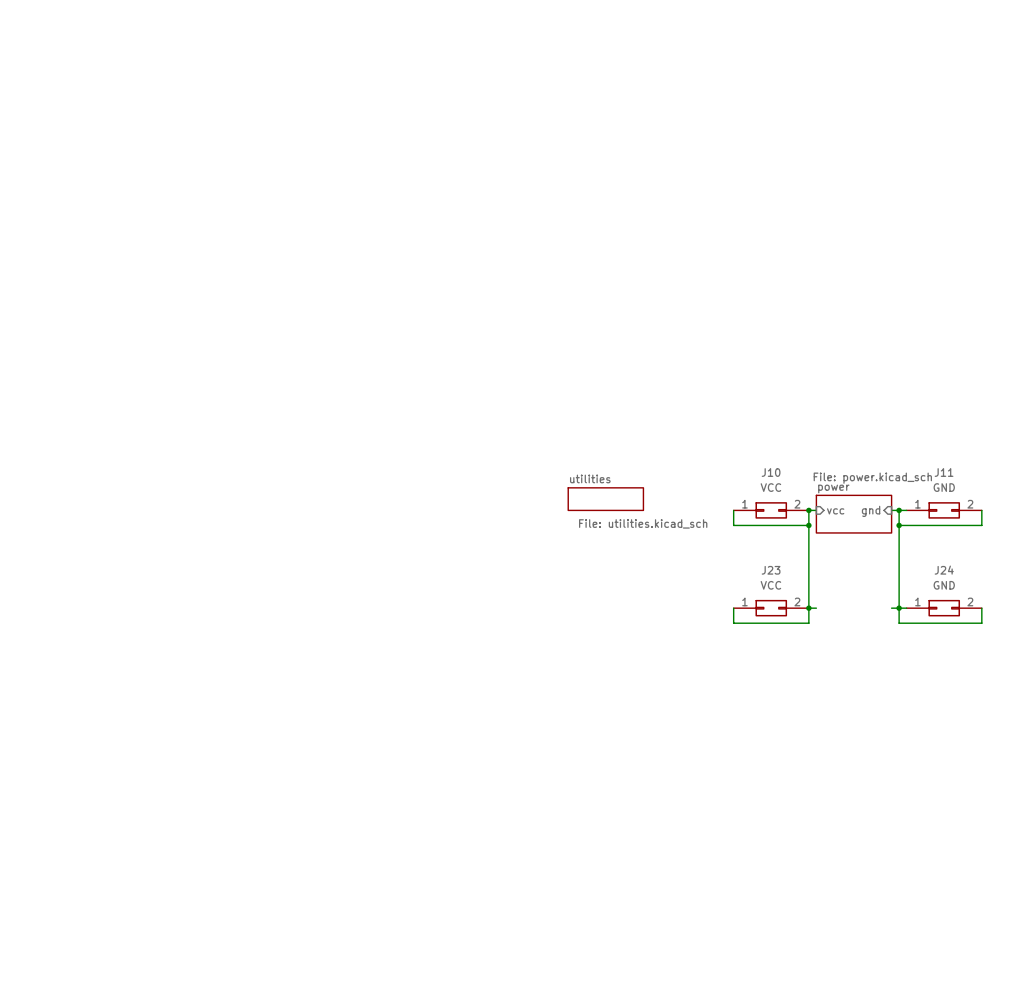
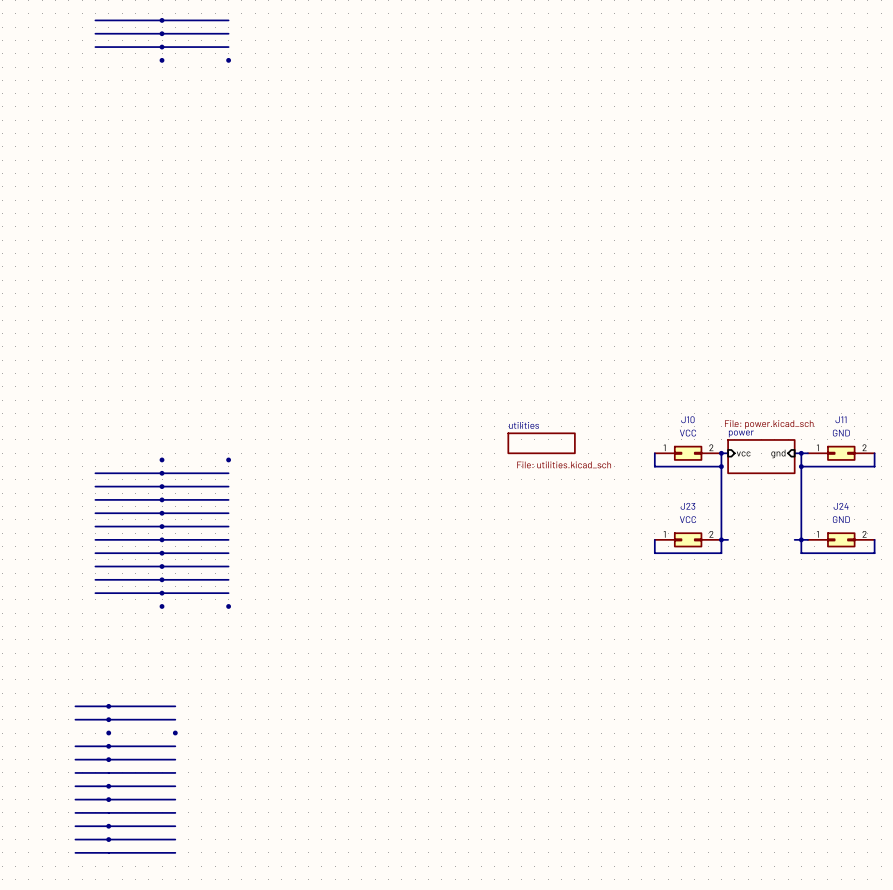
wire: none -> (95, 20) (228, 20)
junction: none -> (162, 20)
wire: none -> (95, 33) (228, 33)
junction: none -> (162, 33)
wire: none -> (95, 47) (228, 47)
junction: none -> (162, 47)
junction: none -> (162, 60)
junction: none -> (228, 60)
junction: none -> (162, 459)
junction: none -> (228, 459)
wire: none -> (95, 473) (228, 473)
junction: none -> (162, 473)
wire: none -> (95, 486) (228, 486)
junction: none -> (162, 486)
wire: none -> (95, 499) (228, 499)
junction: none -> (162, 499)
wire: none -> (95, 513) (228, 513)
junction: none -> (162, 513)
wire: none -> (95, 526) (228, 526)
junction: none -> (162, 526)
wire: none -> (95, 539) (228, 539)
junction: none -> (162, 539)
wire: none -> (95, 553) (228, 553)
junction: none -> (162, 553)
wire: none -> (95, 566) (228, 566)
junction: none -> (162, 566)
wire: none -> (95, 579) (228, 579)
junction: none -> (162, 579)
wire: none -> (95, 593) (228, 593)
junction: none -> (162, 593)
junction: none -> (162, 606)
junction: none -> (228, 606)
wire: none -> (75, 706) (175, 706)
junction: none -> (108, 706)
wire: none -> (75, 719) (175, 719)
junction: none -> (108, 719)
junction: none -> (108, 733)
junction: none -> (175, 733)
wire: none -> (75, 746) (175, 746)
junction: none -> (108, 746)
wire: none -> (75, 759) (175, 759)
junction: none -> (108, 759)
wire: none -> (75, 772) (175, 772)
wire: none -> (75, 786) (175, 786)
junction: none -> (108, 786)
wire: none -> (75, 799) (175, 799)
junction: none -> (108, 799)
wire: none -> (75, 812) (175, 812)
wire: none -> (75, 826) (175, 826)
junction: none -> (108, 826)
wire: none -> (75, 839) (175, 839)
junction: none -> (108, 839)
wire: none -> (75, 852) (175, 852)

